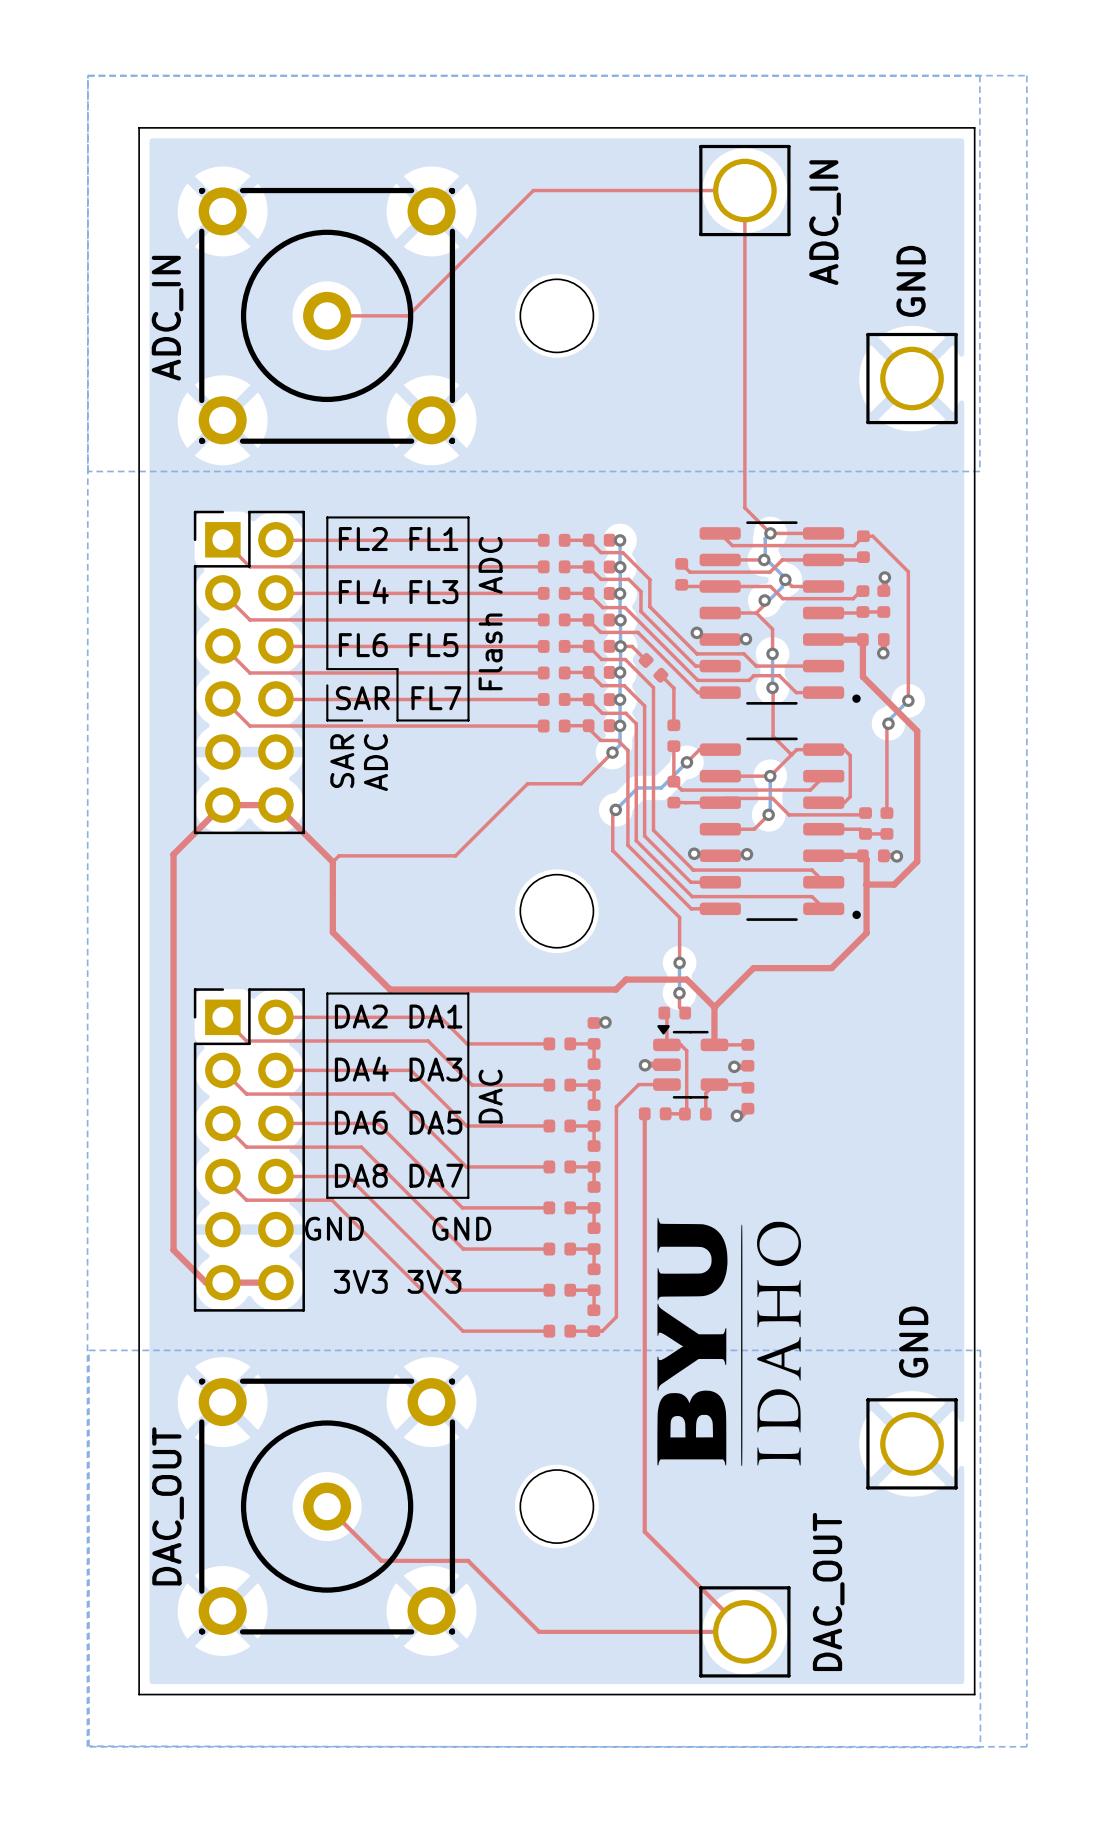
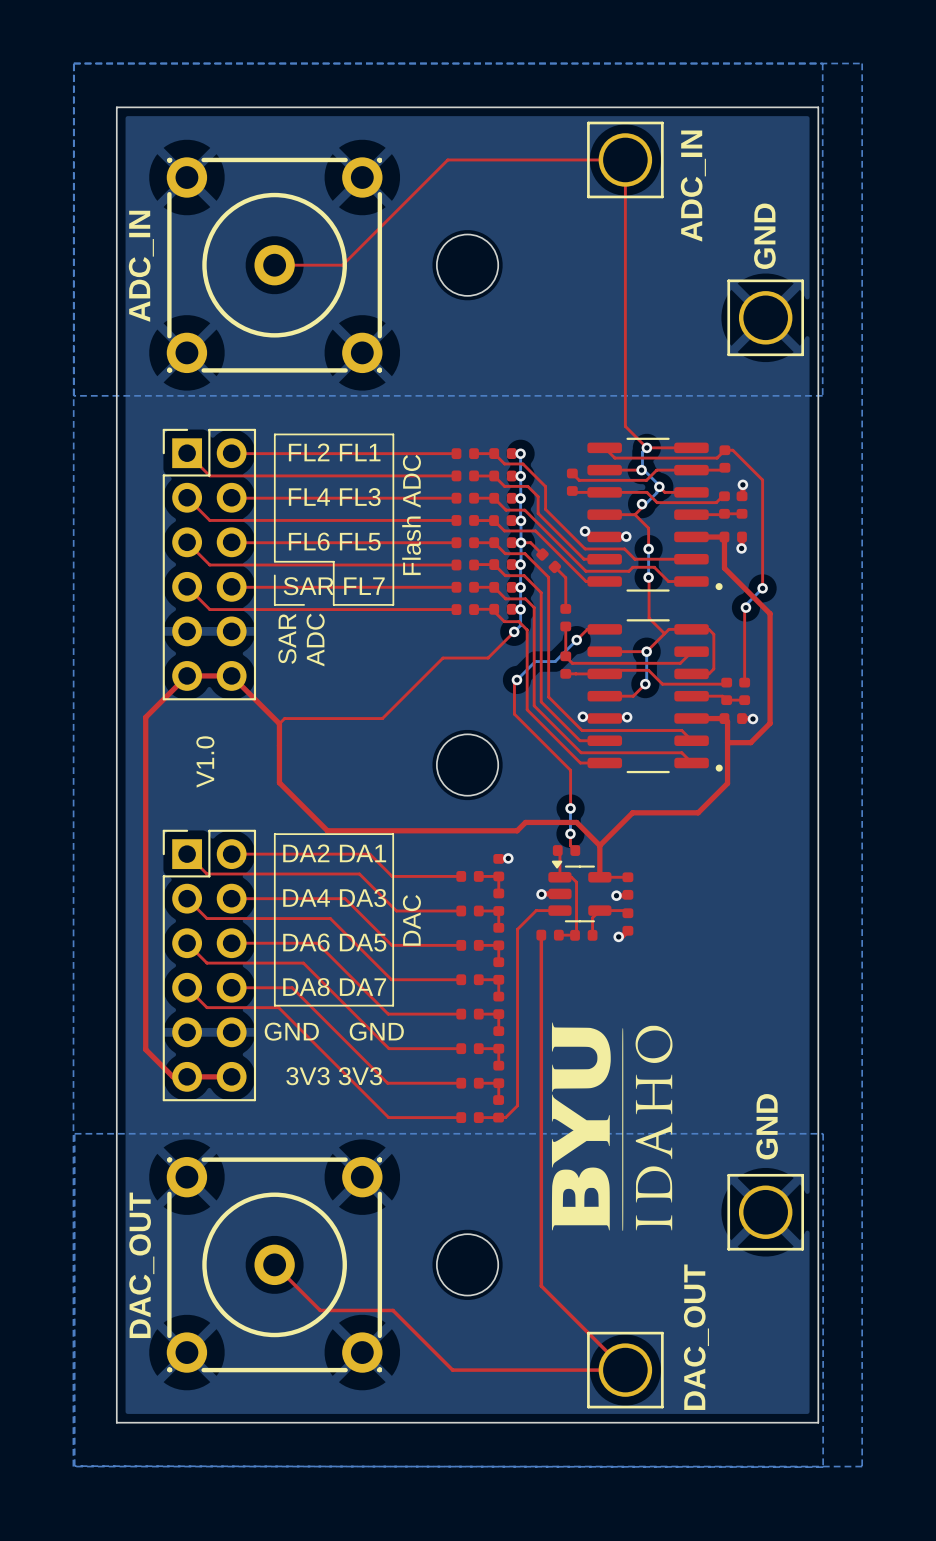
text: none -> V1.0 (205, 761)

